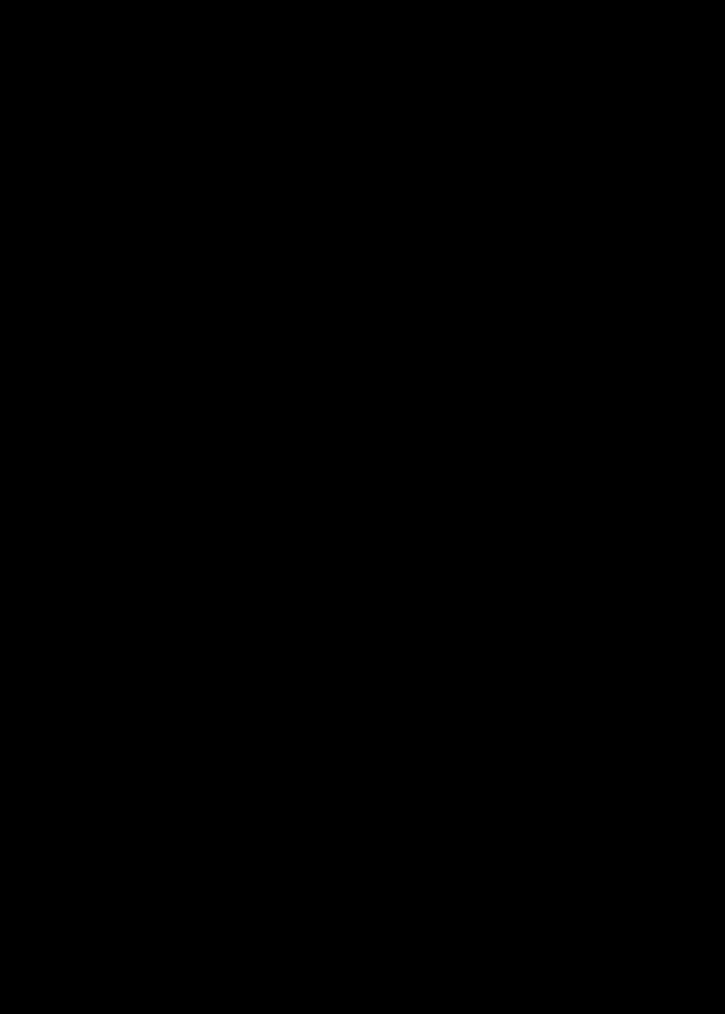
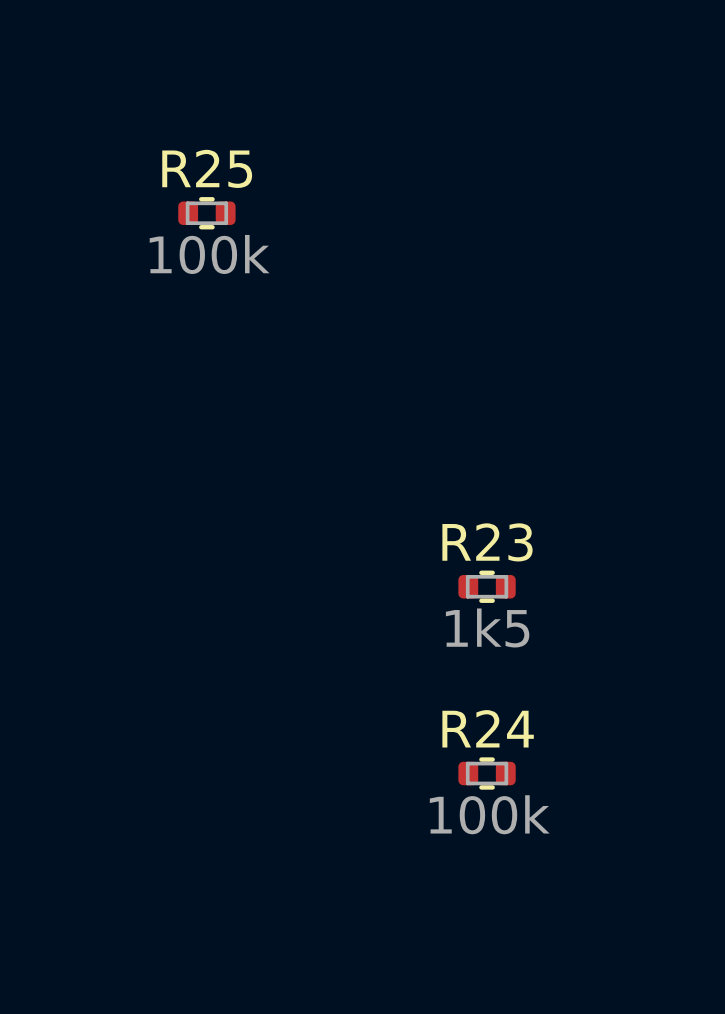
R25: none -> 100k (206, 213)
R23: none -> 1k5 (487, 586)
R24: none -> 100k (487, 773)

